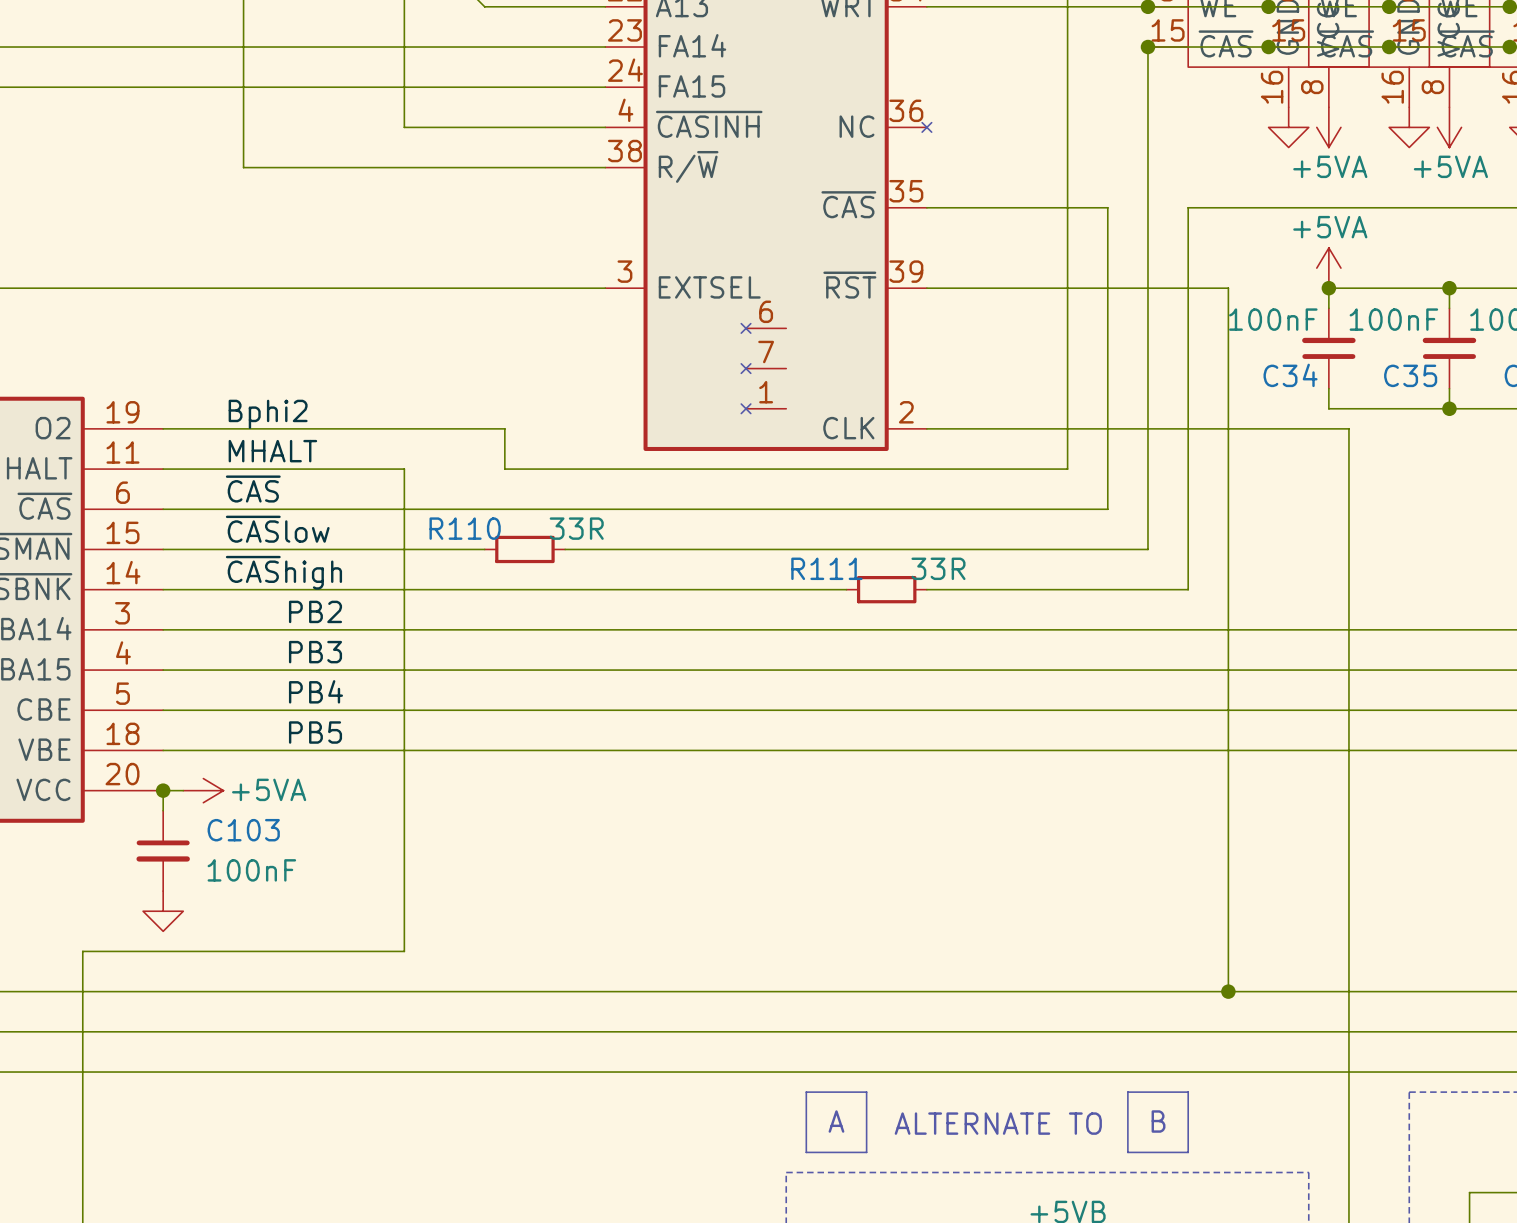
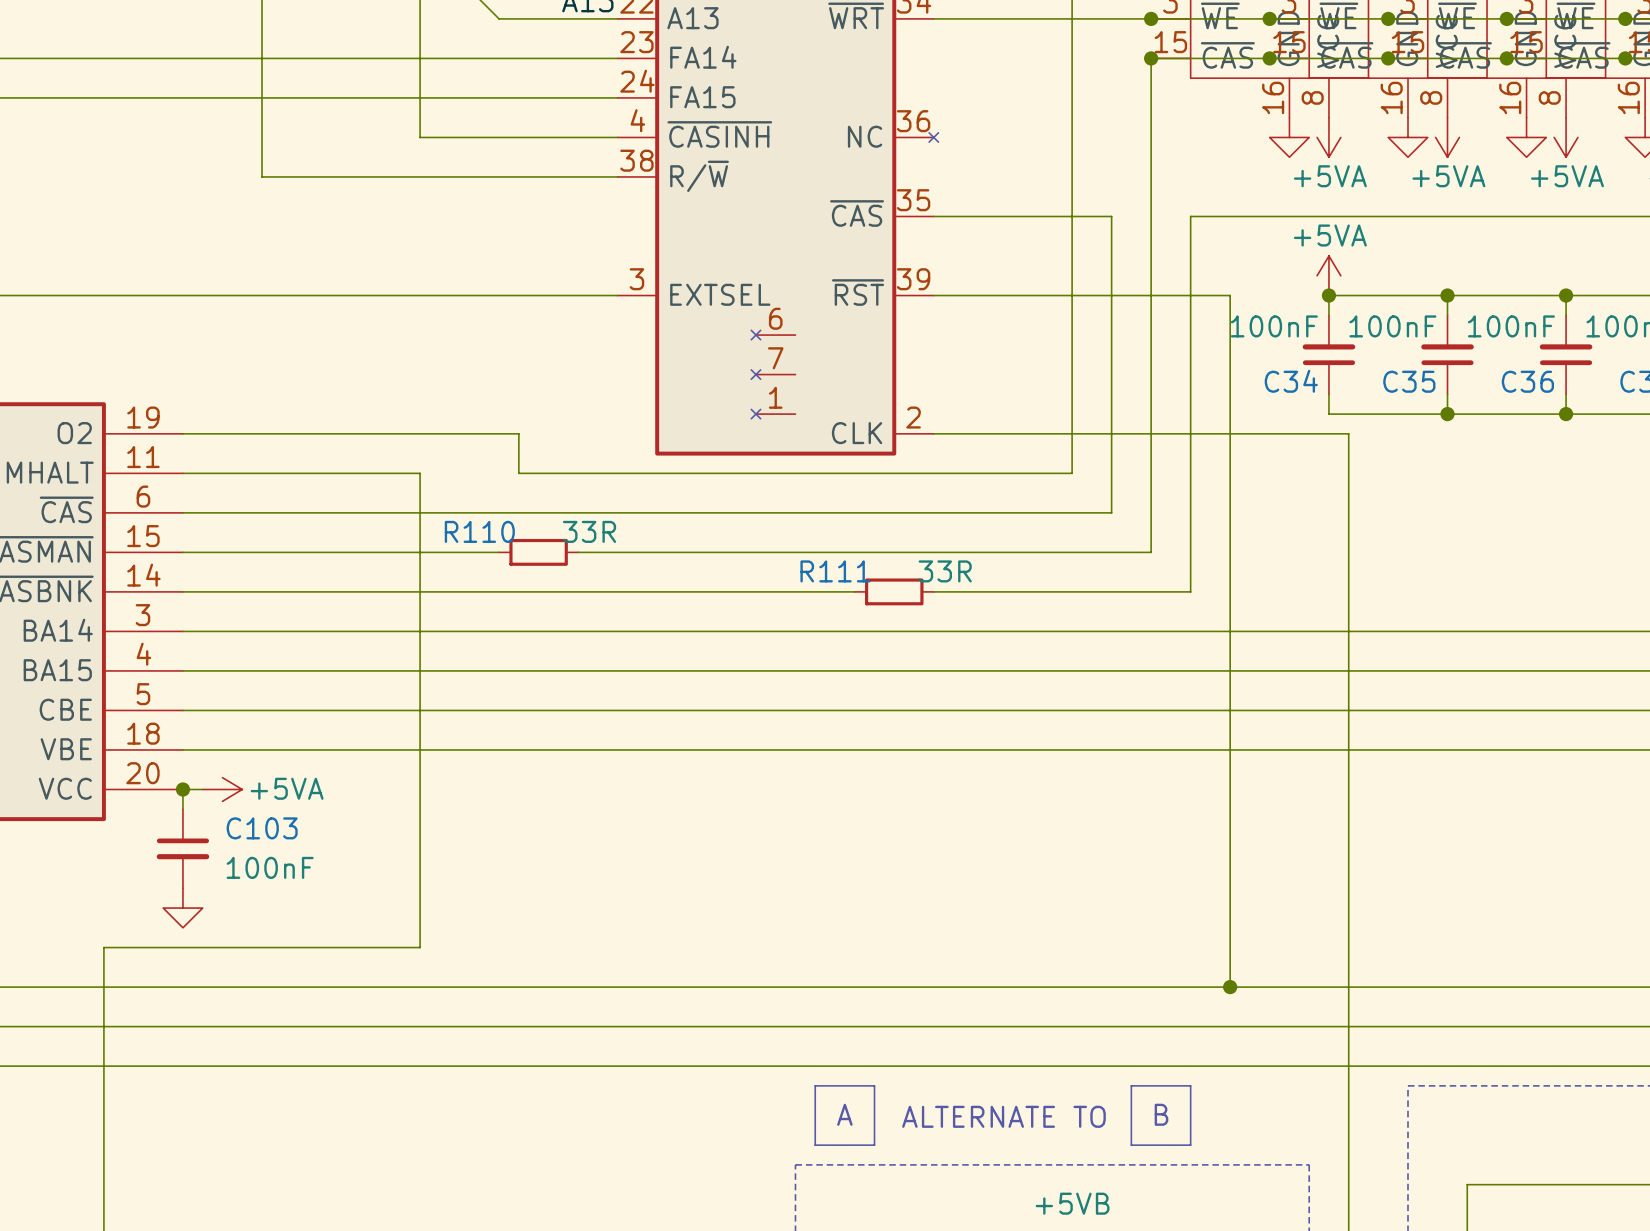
label: Bphi2 (268, 414) -> none
label: MHALT (272, 451) -> none
label: ~{CAS} (253, 489) -> none
label: ~{CAS}low (277, 529) -> none
label: ~{CAS}high (283, 572) -> none
label: PB2 (315, 611) -> none
label: PB3 (315, 652) -> none
label: PB4 (315, 691) -> none
label: PB5 (315, 732) -> none

